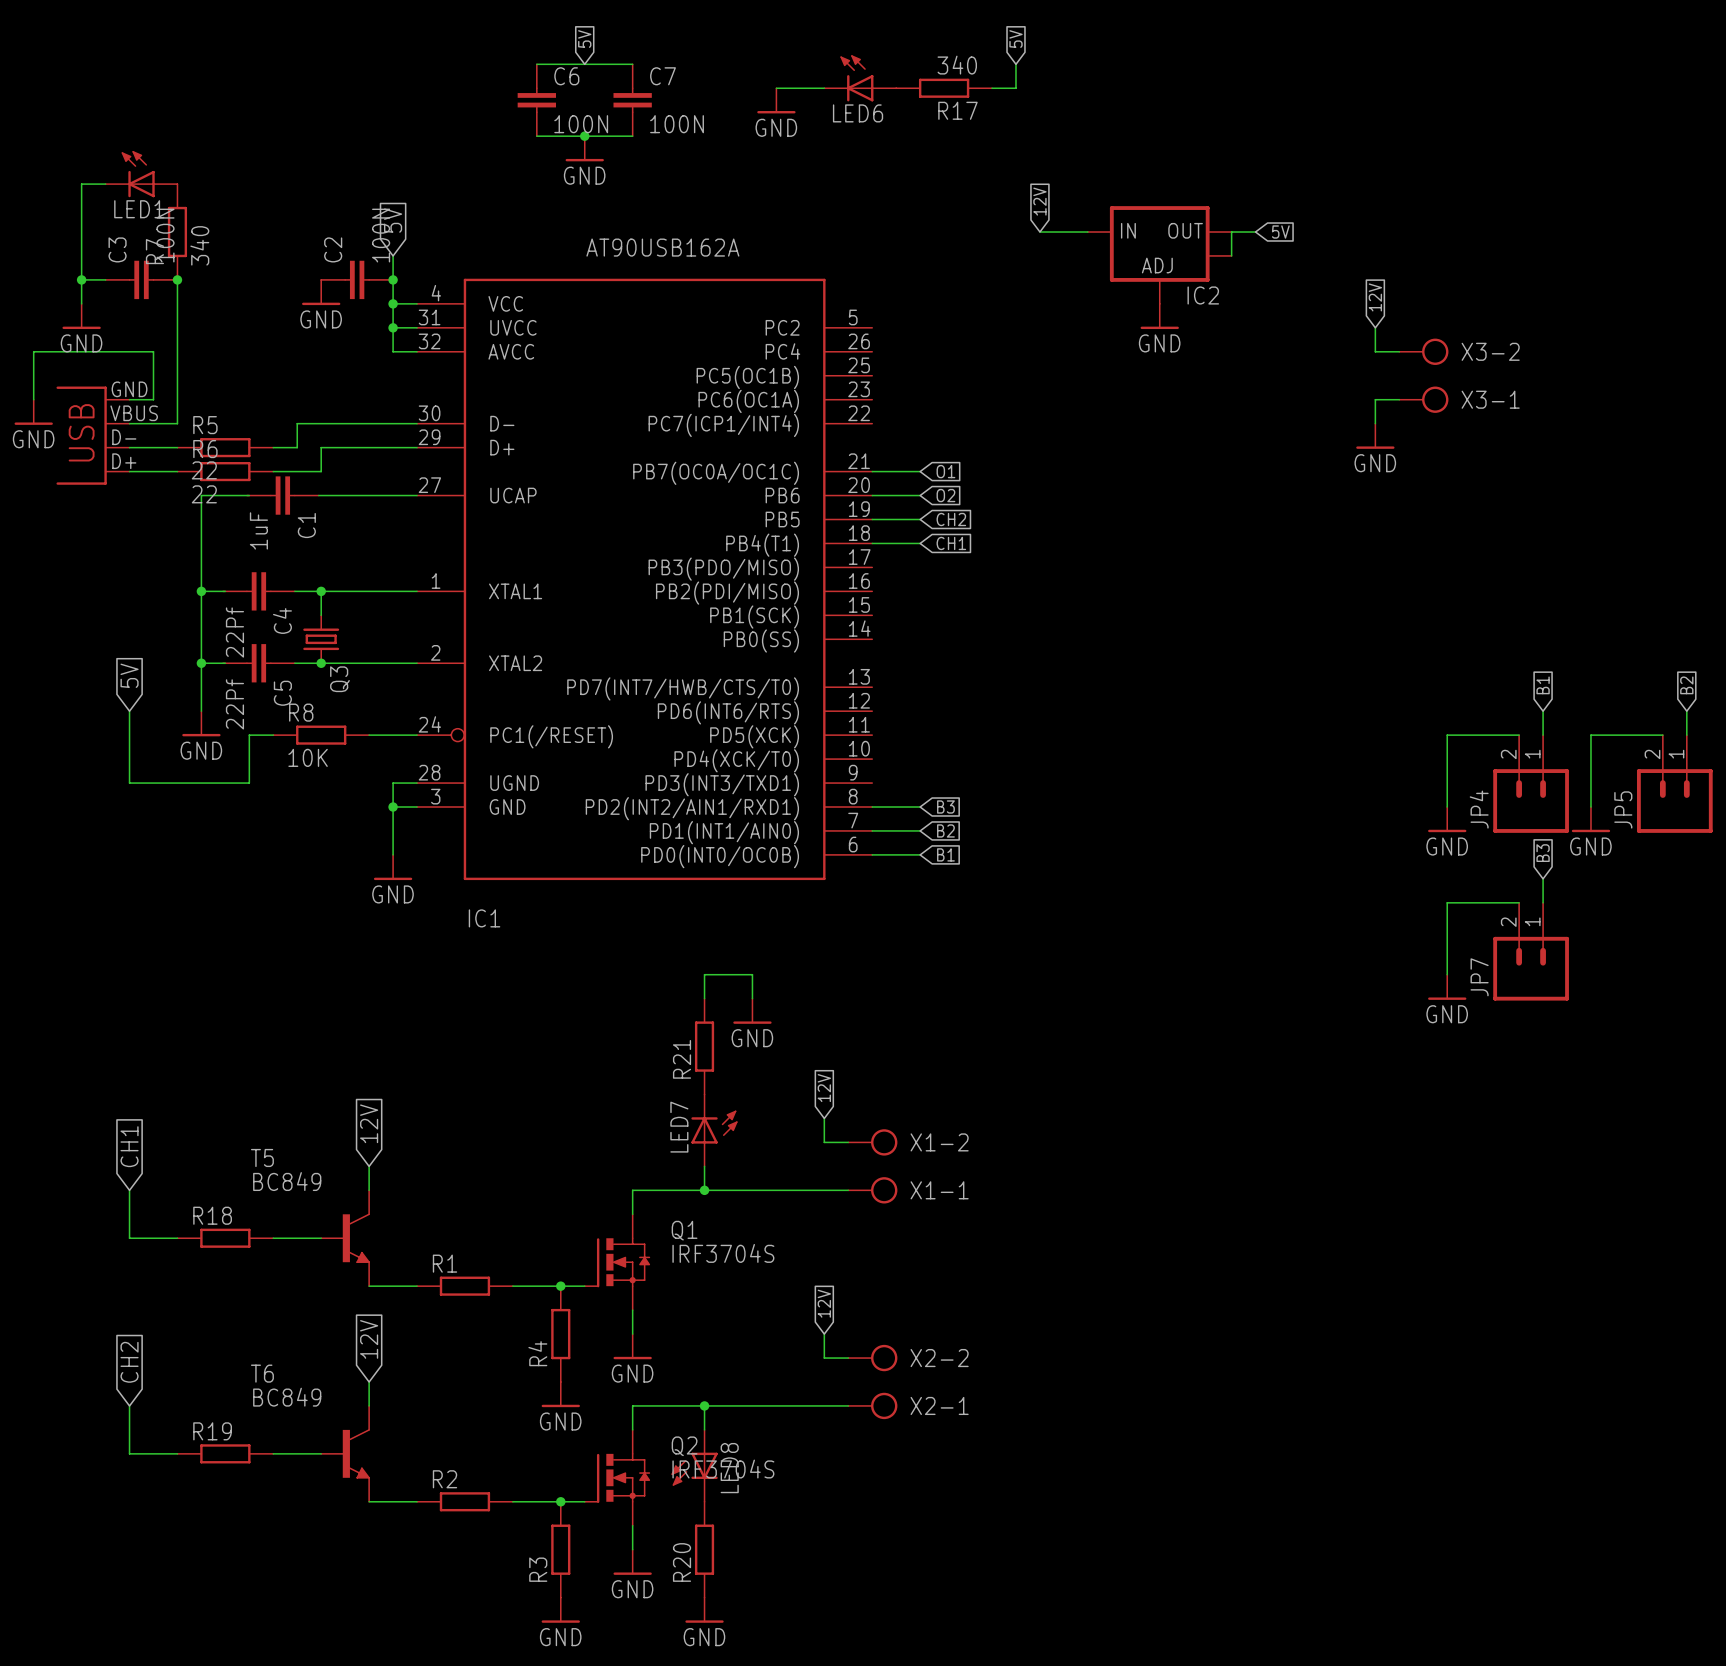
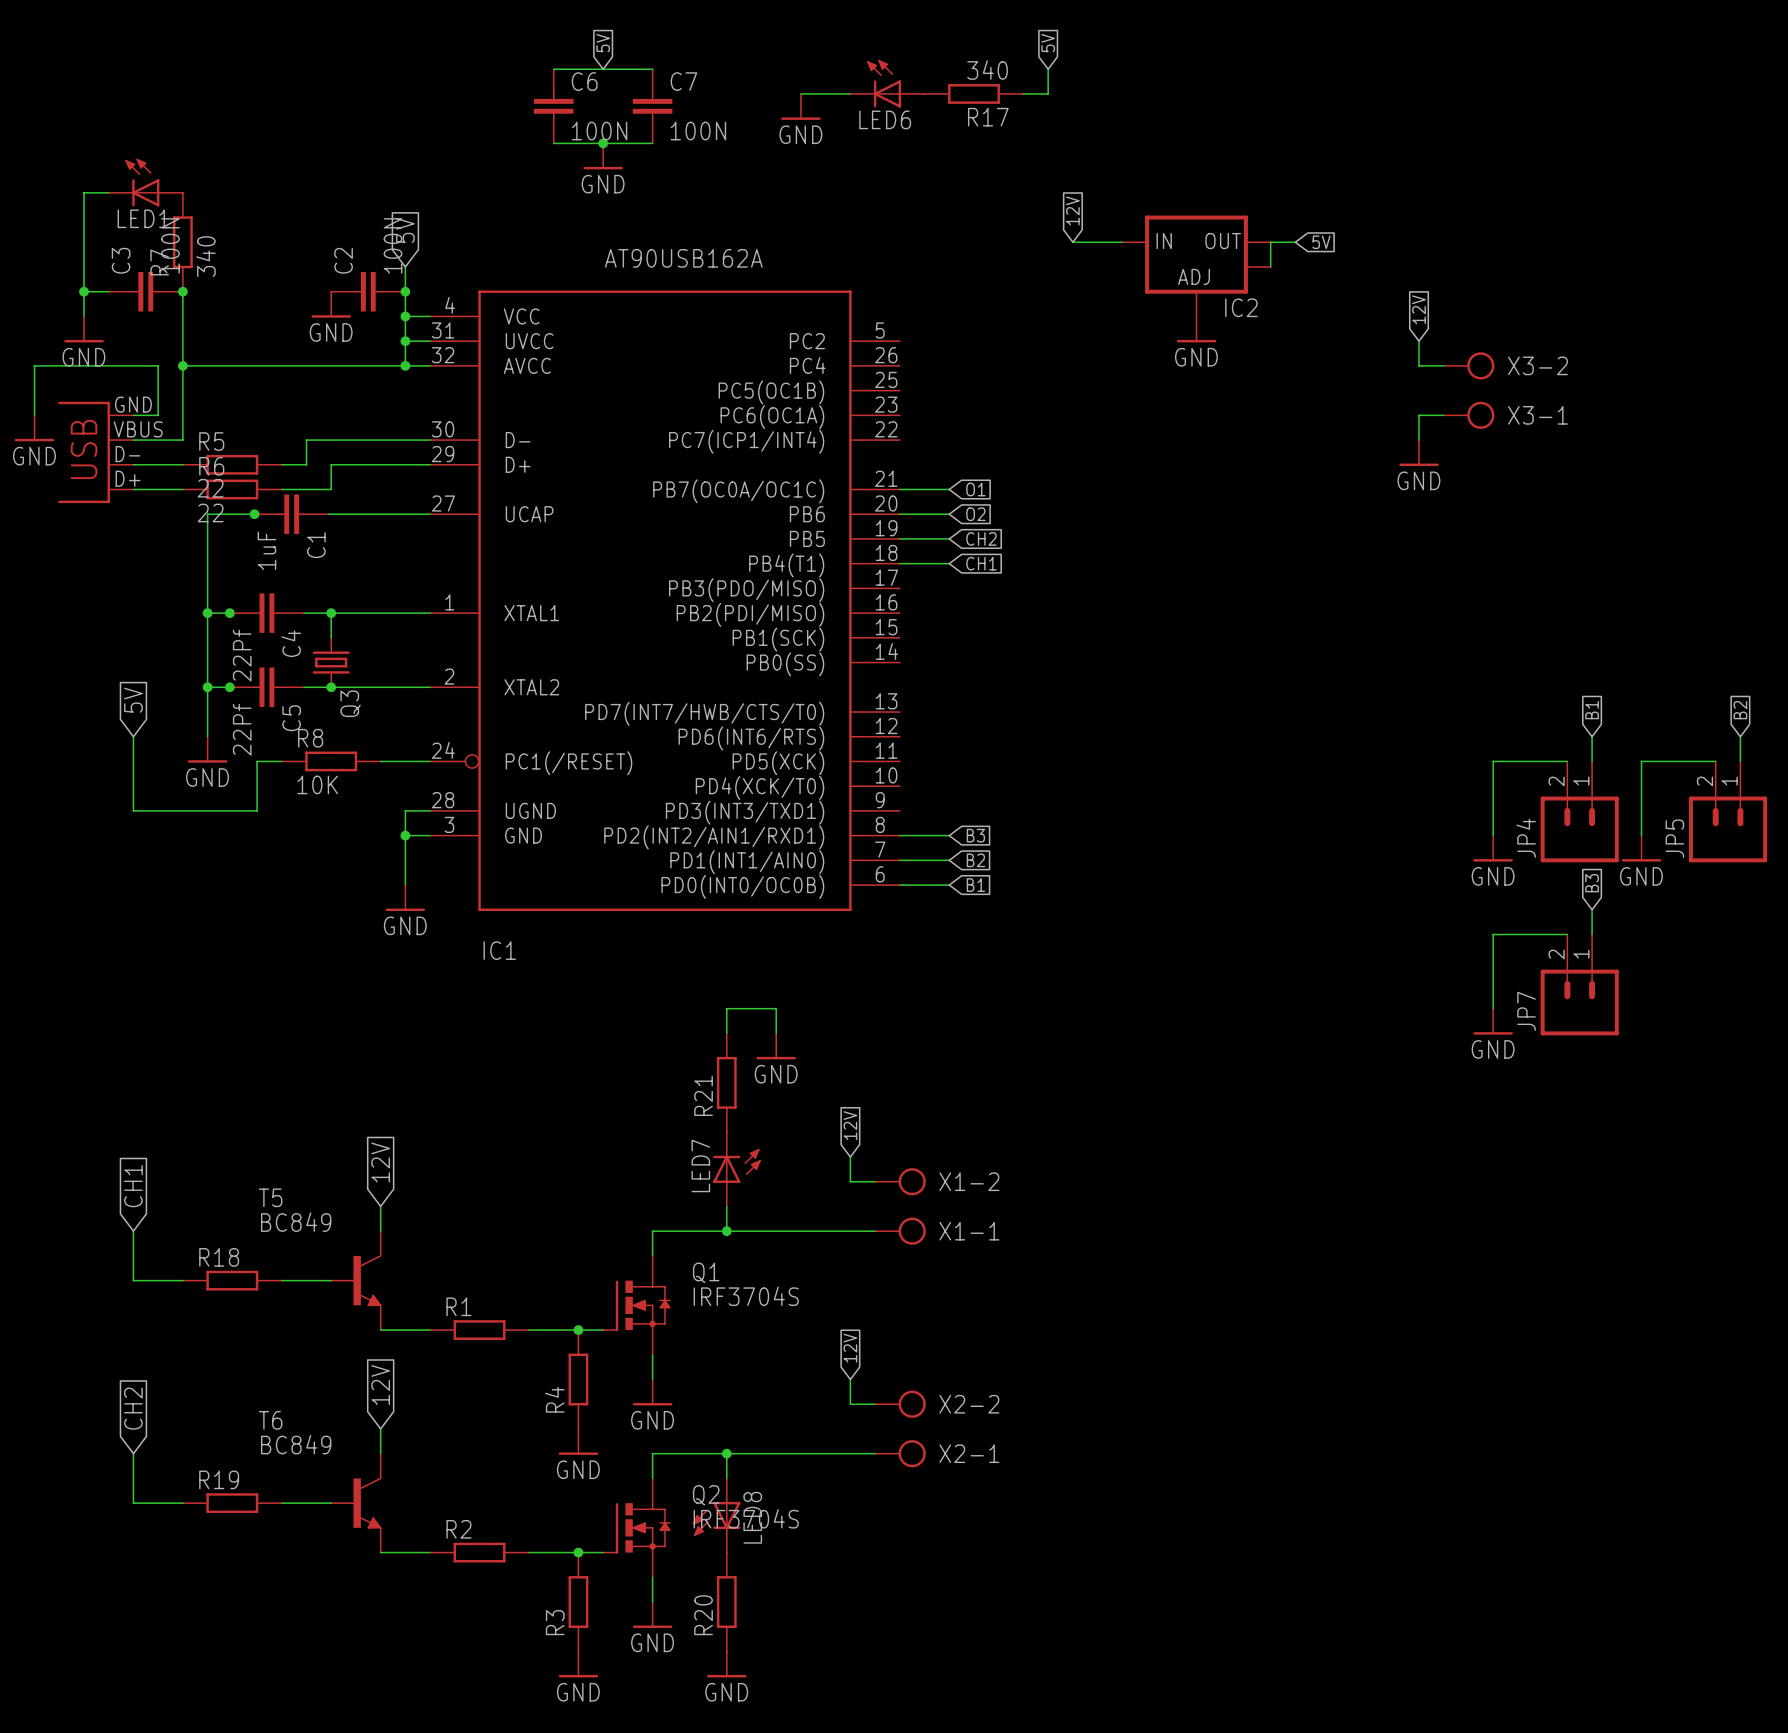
wire: none -> (182, 365) (405, 365)
junction: none -> (182, 365)
junction: none -> (405, 365)
junction: none -> (254, 514)
junction: none -> (229, 613)
junction: none -> (229, 687)

